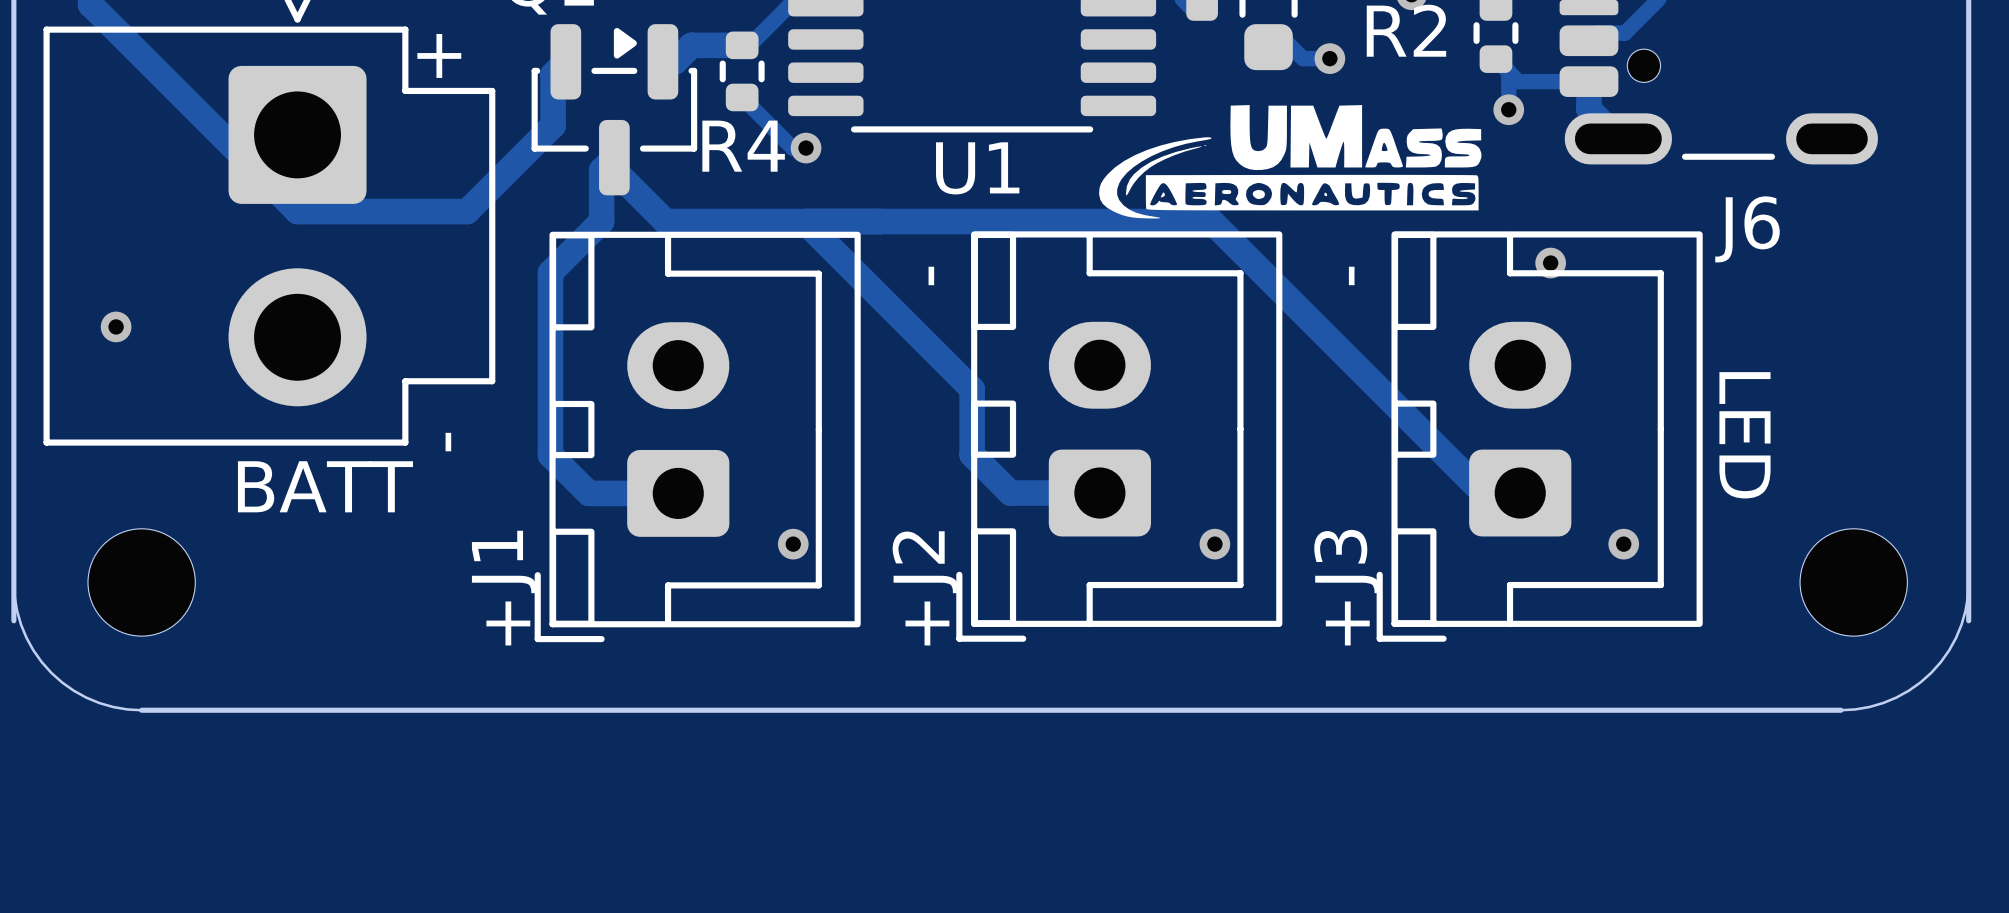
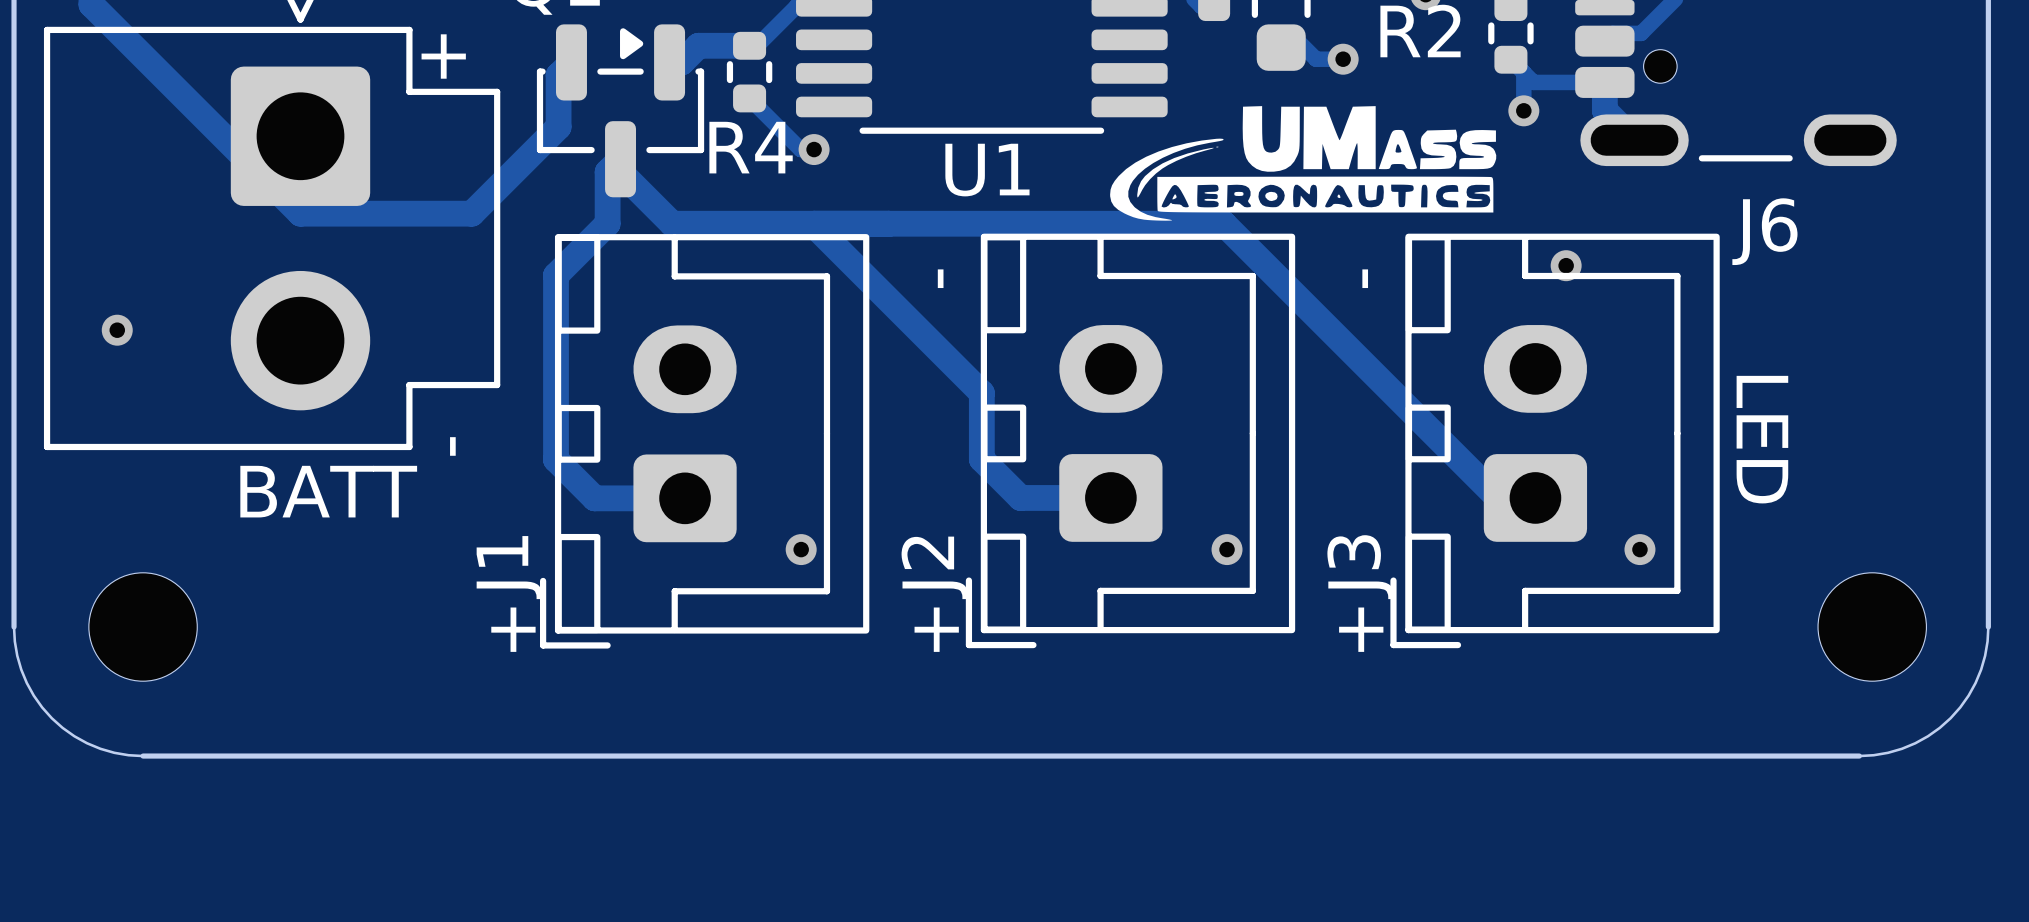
board edge: (13, 582) (14, 596) (21, 624) (33, 650) (51, 672) (61, 682) (86, 697) (113, 707) (141, 710) (1855, 709) (1883, 703) (1896, 697) (1920, 682) (1931, 672) (1949, 650) (1961, 624) (1967, 596) (1968, 582) -> (14, 627) (14, 641) (21, 669) (33, 695) (51, 718) (74, 736) (100, 748) (114, 752) (143, 756) (1873, 755) (1901, 748) (1927, 736) (1950, 718) (1960, 707) (1968, 695) (1981, 669) (1985, 655) (1988, 627)
part position: (141, 582) -> (143, 627)
part position: (1853, 582) -> (1872, 627)

